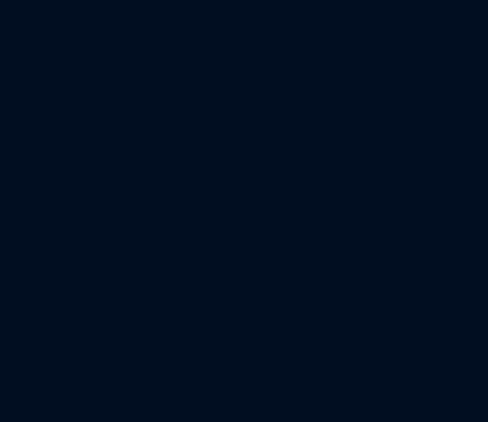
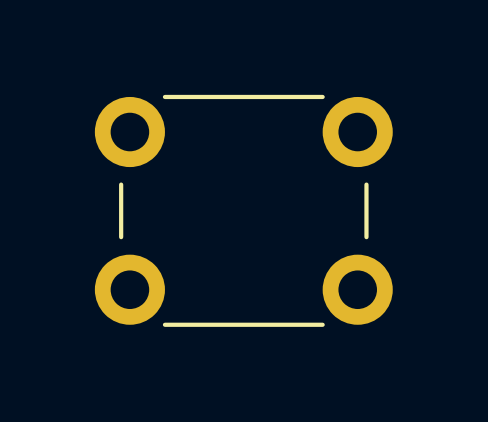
part: none -> (243, 210)

